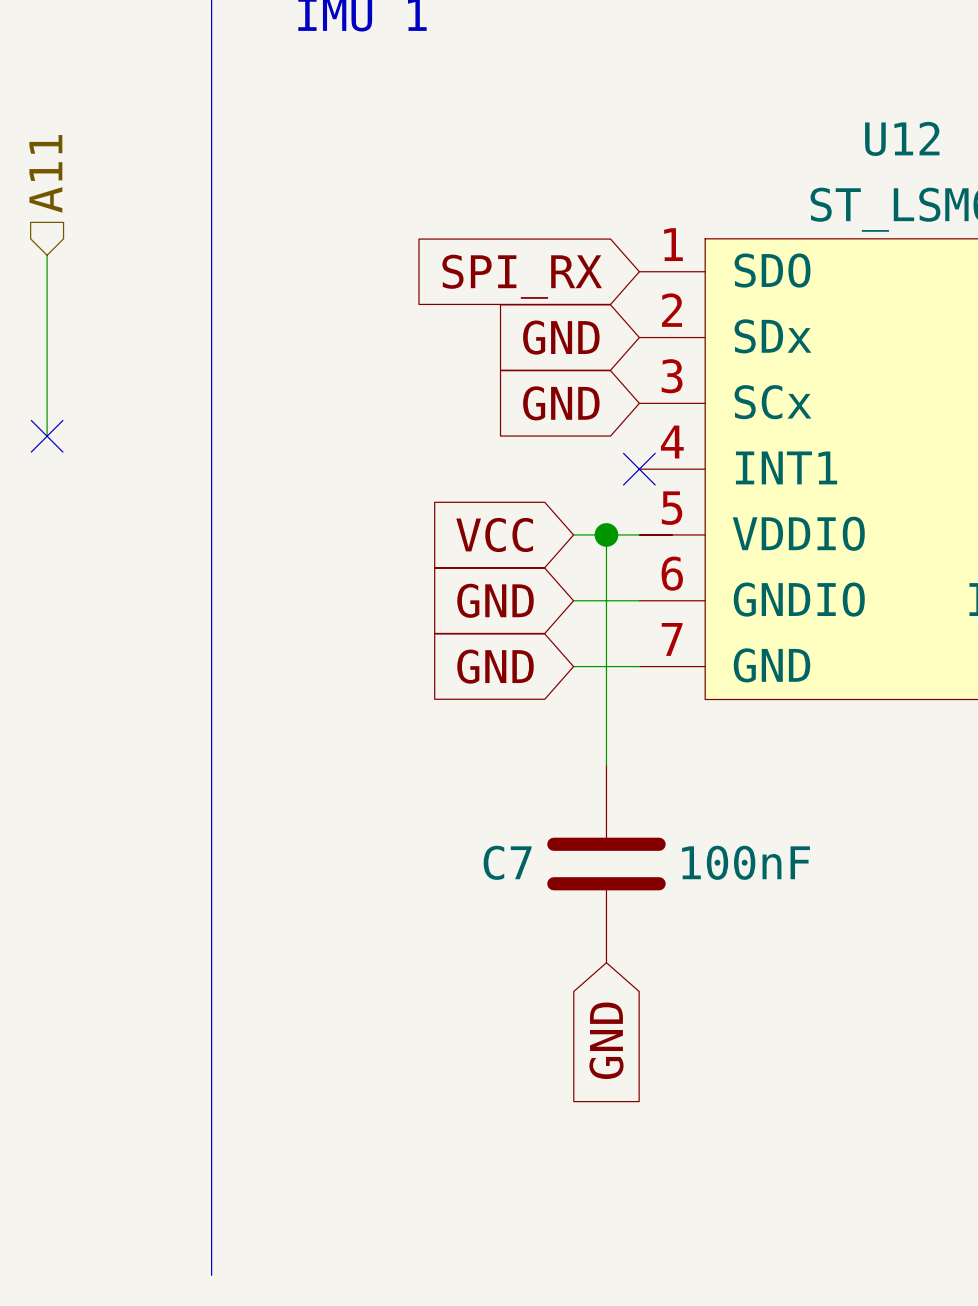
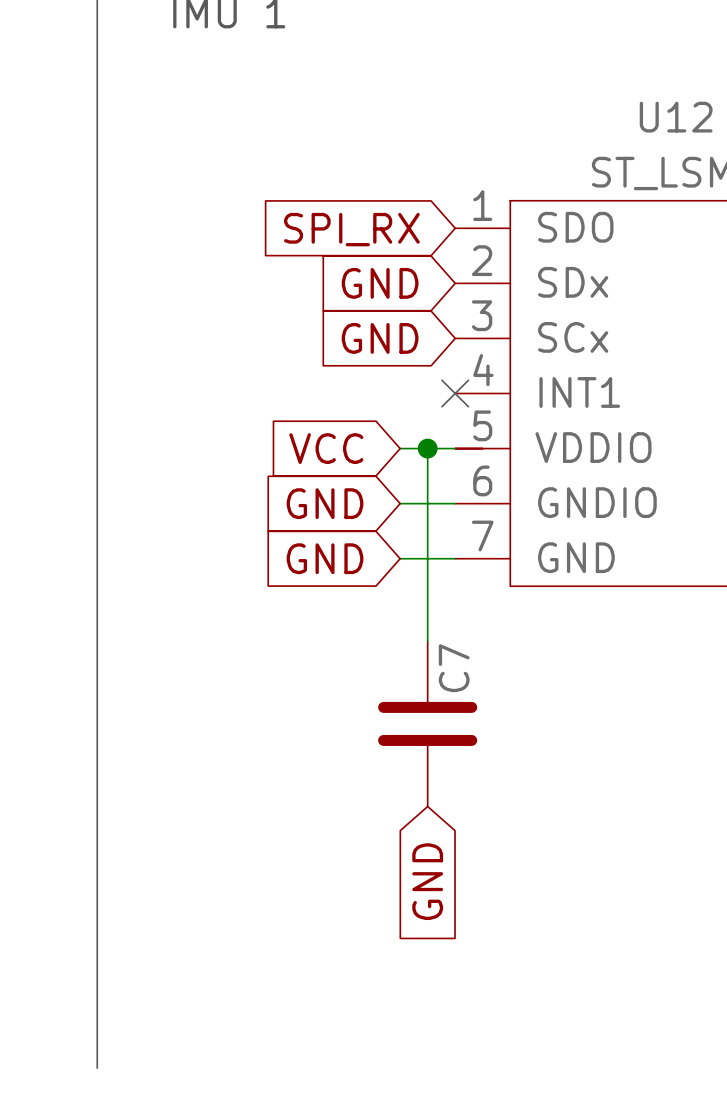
C7 name rotation: 0° (507, 862) -> 90° counterclockwise (454, 668)
C7 name position: C7 (507, 862) -> C7 (454, 668)
C7 value: 100nF (746, 862) -> none

